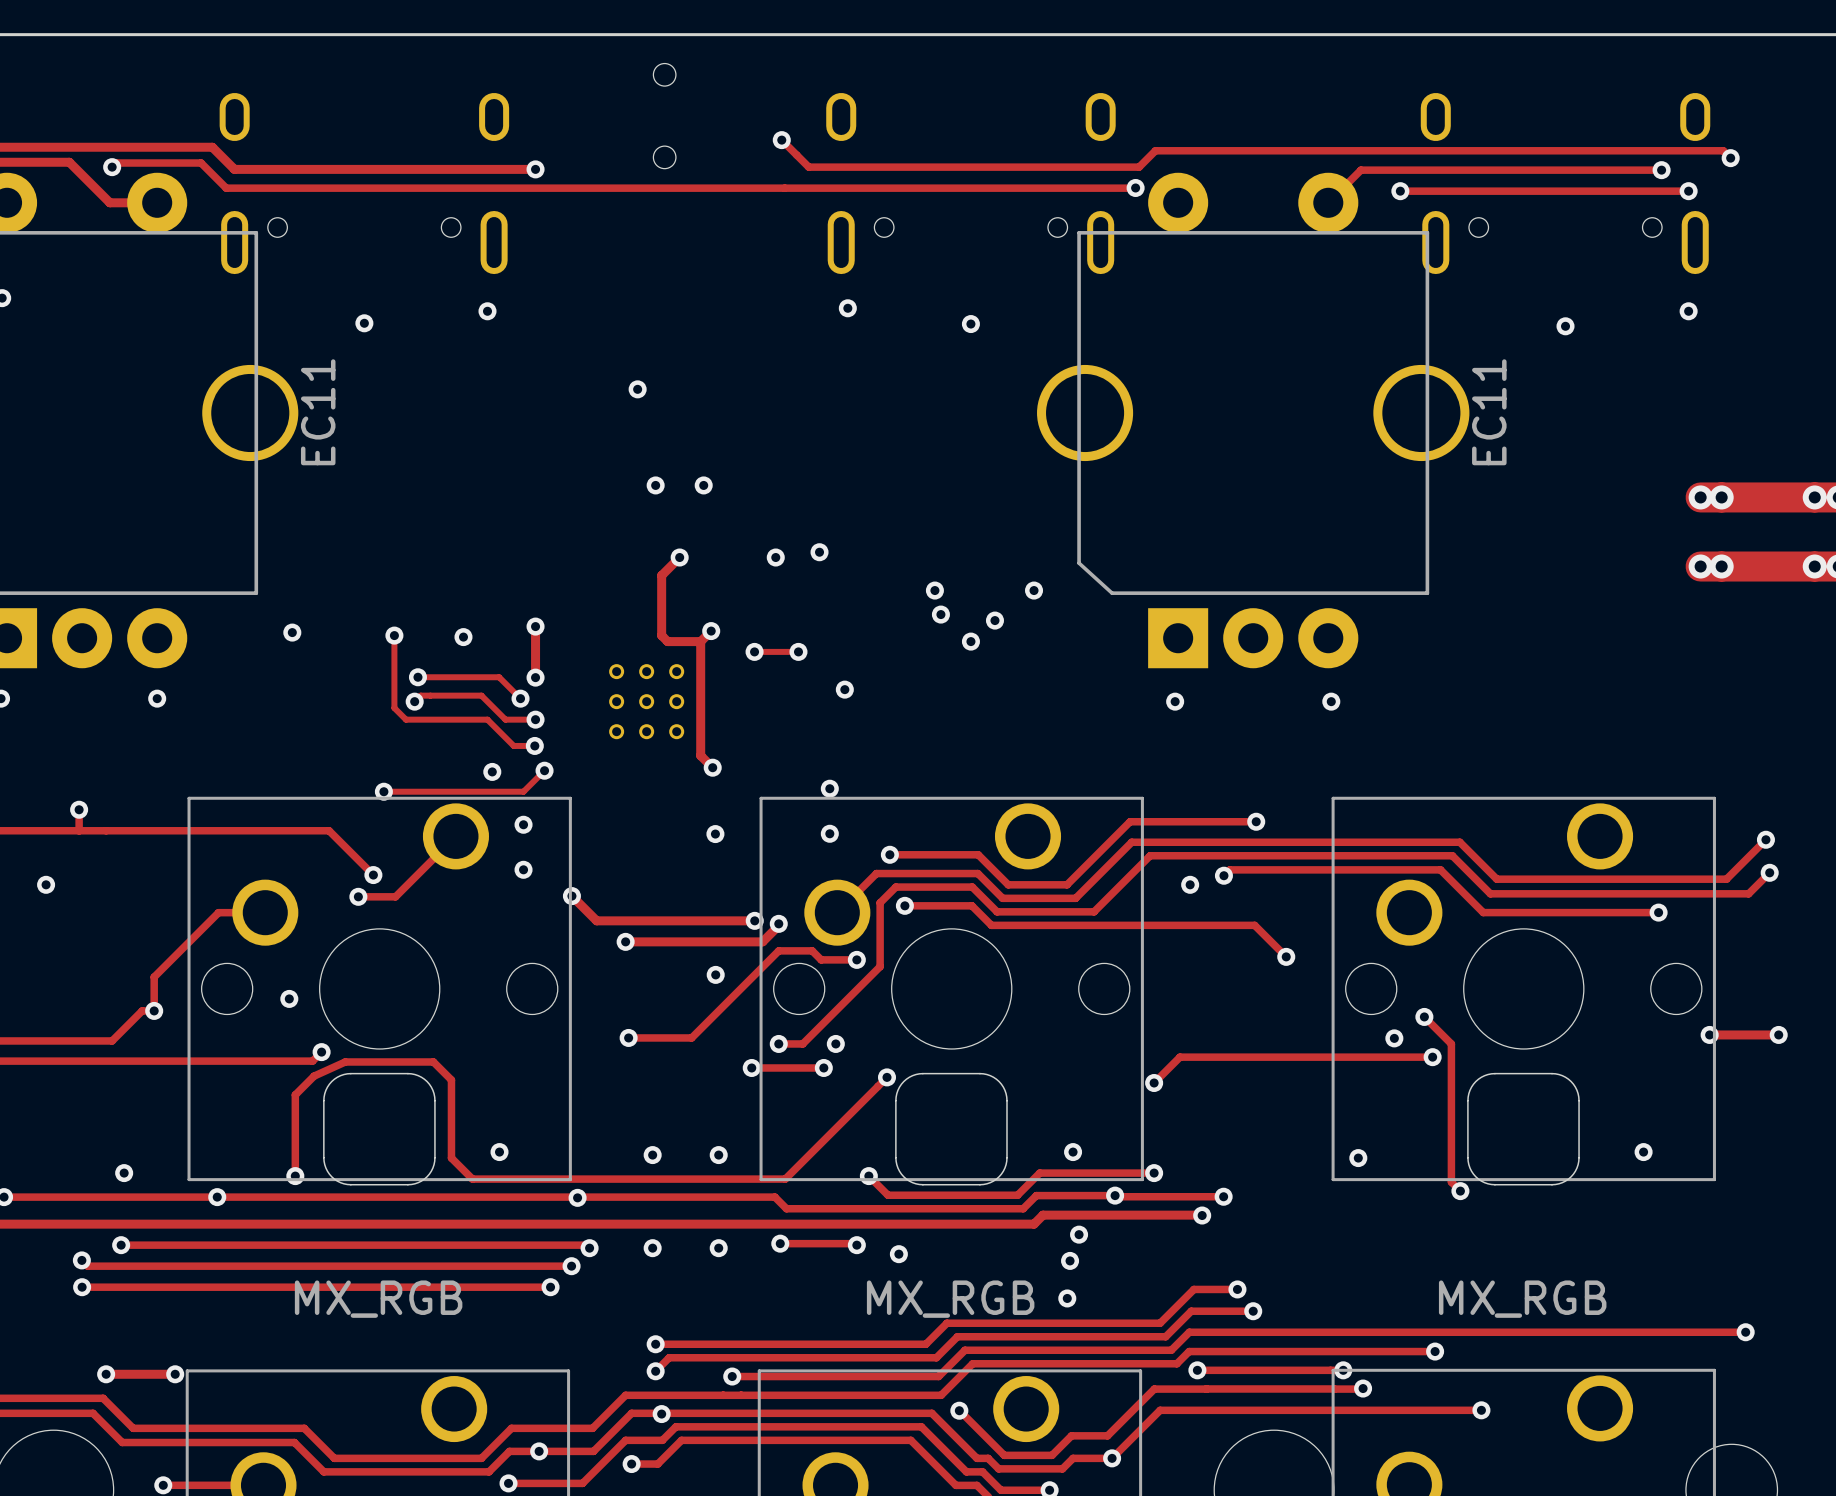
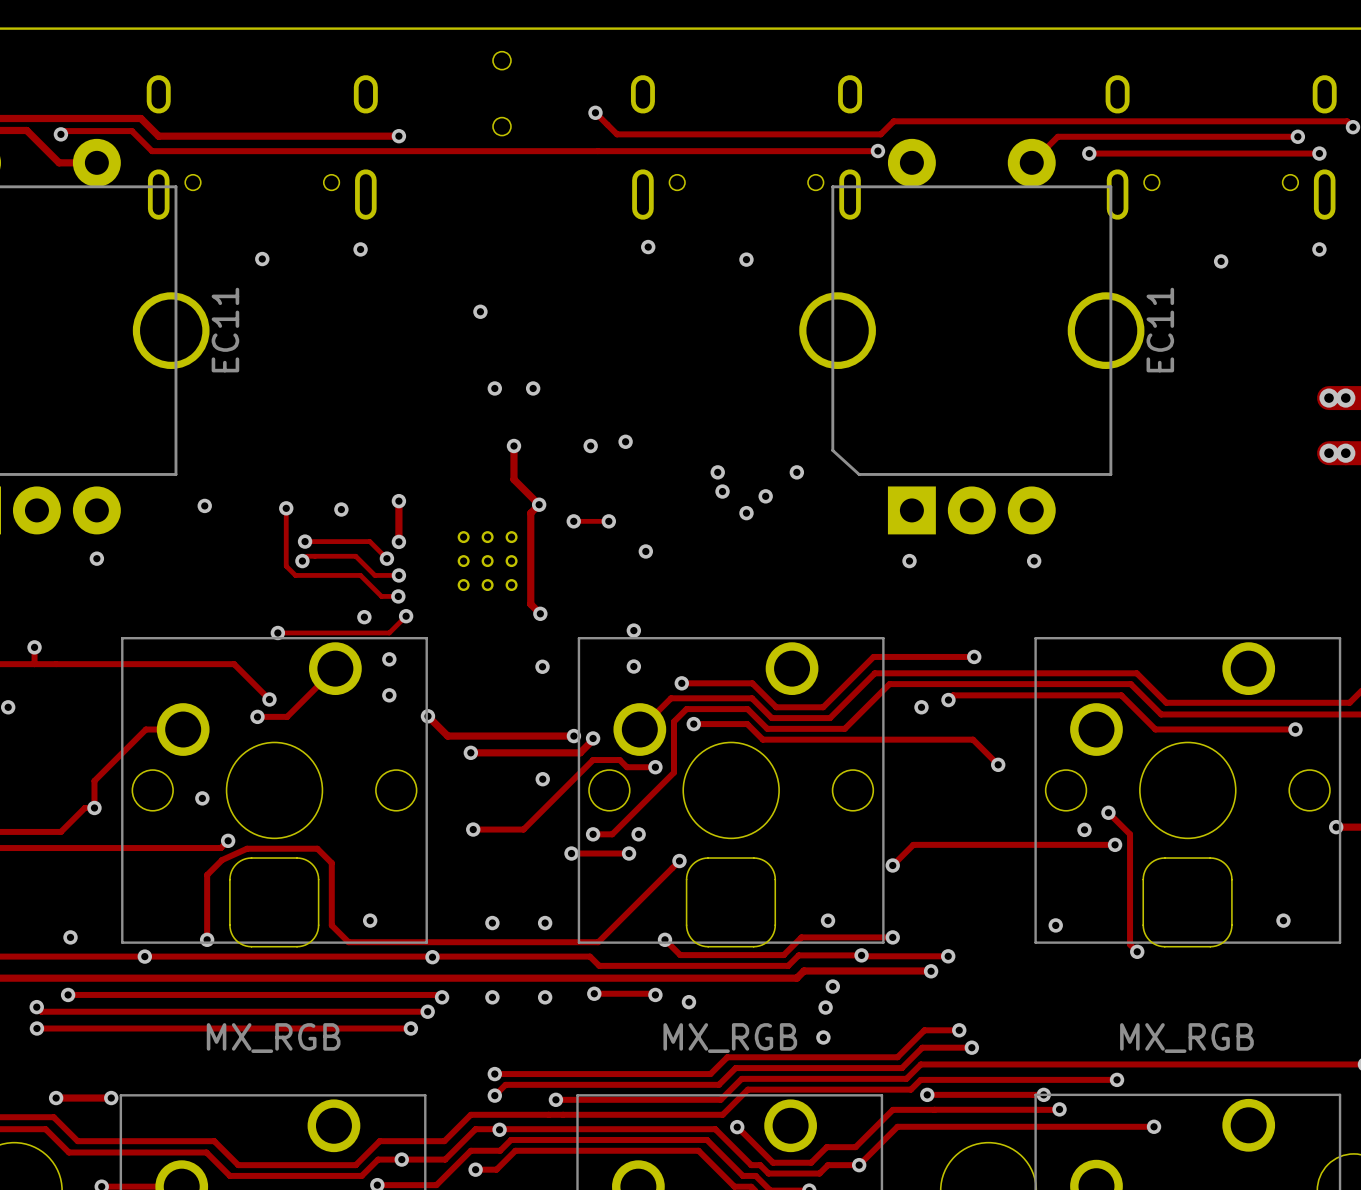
track: (679, 557) (661, 575) (661, 635) (667, 641) (700, 641) -> (513, 446) (513, 479) (539, 504)

